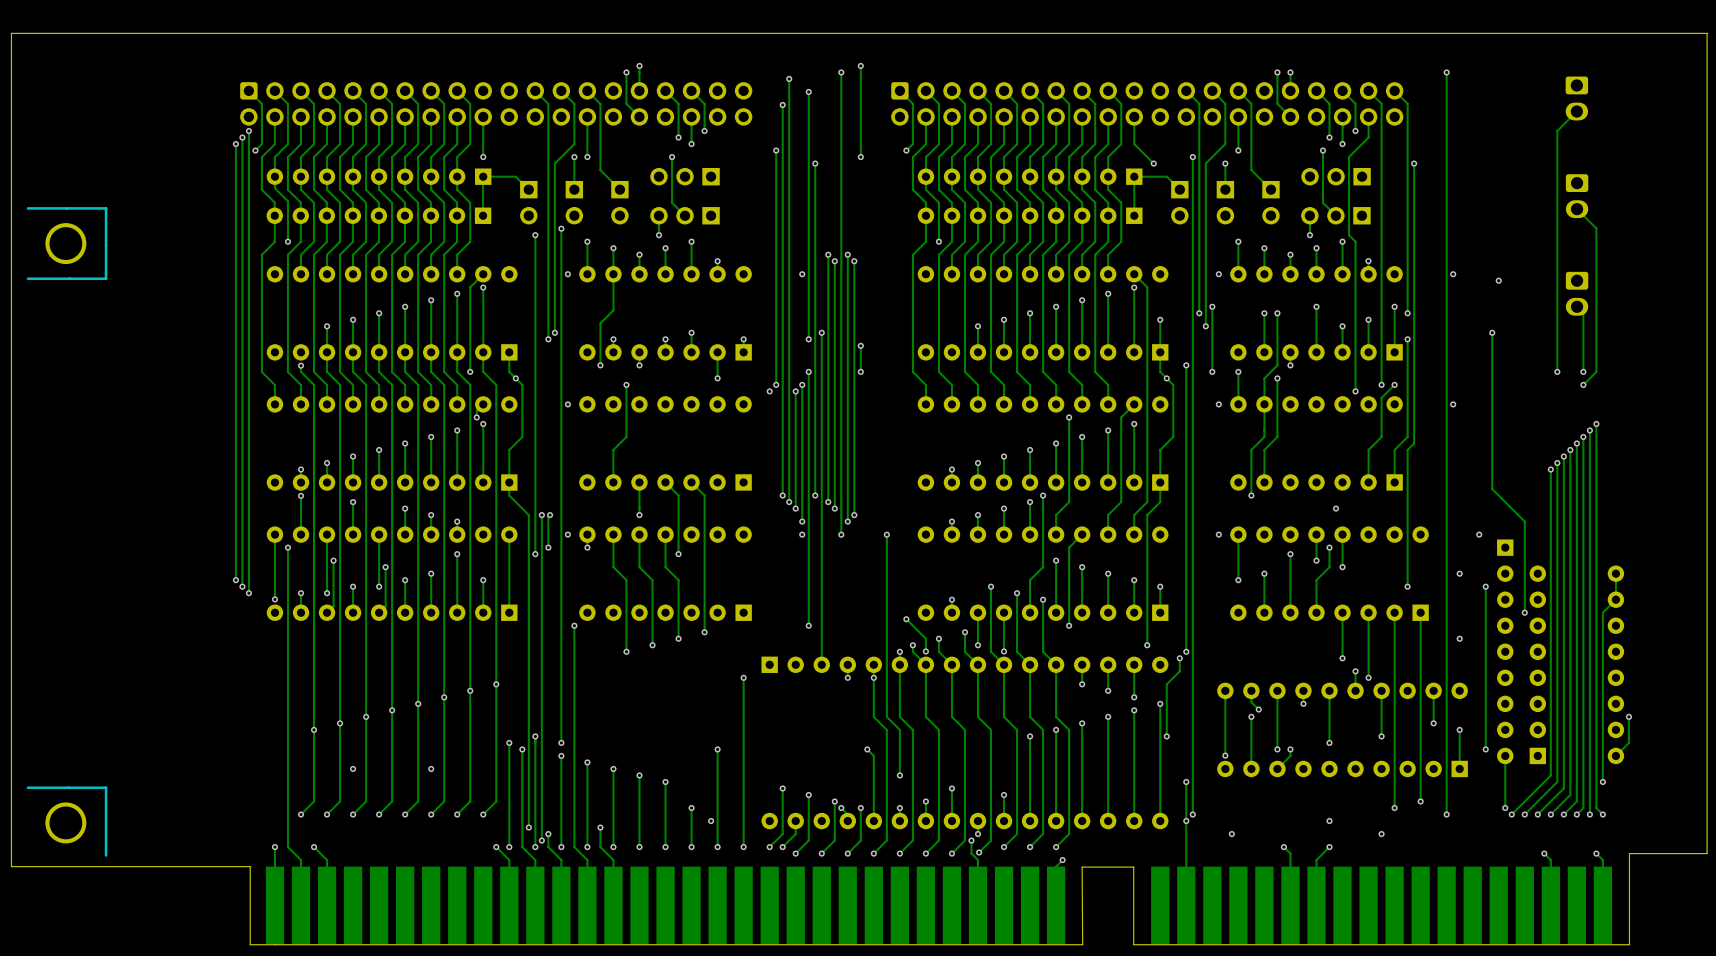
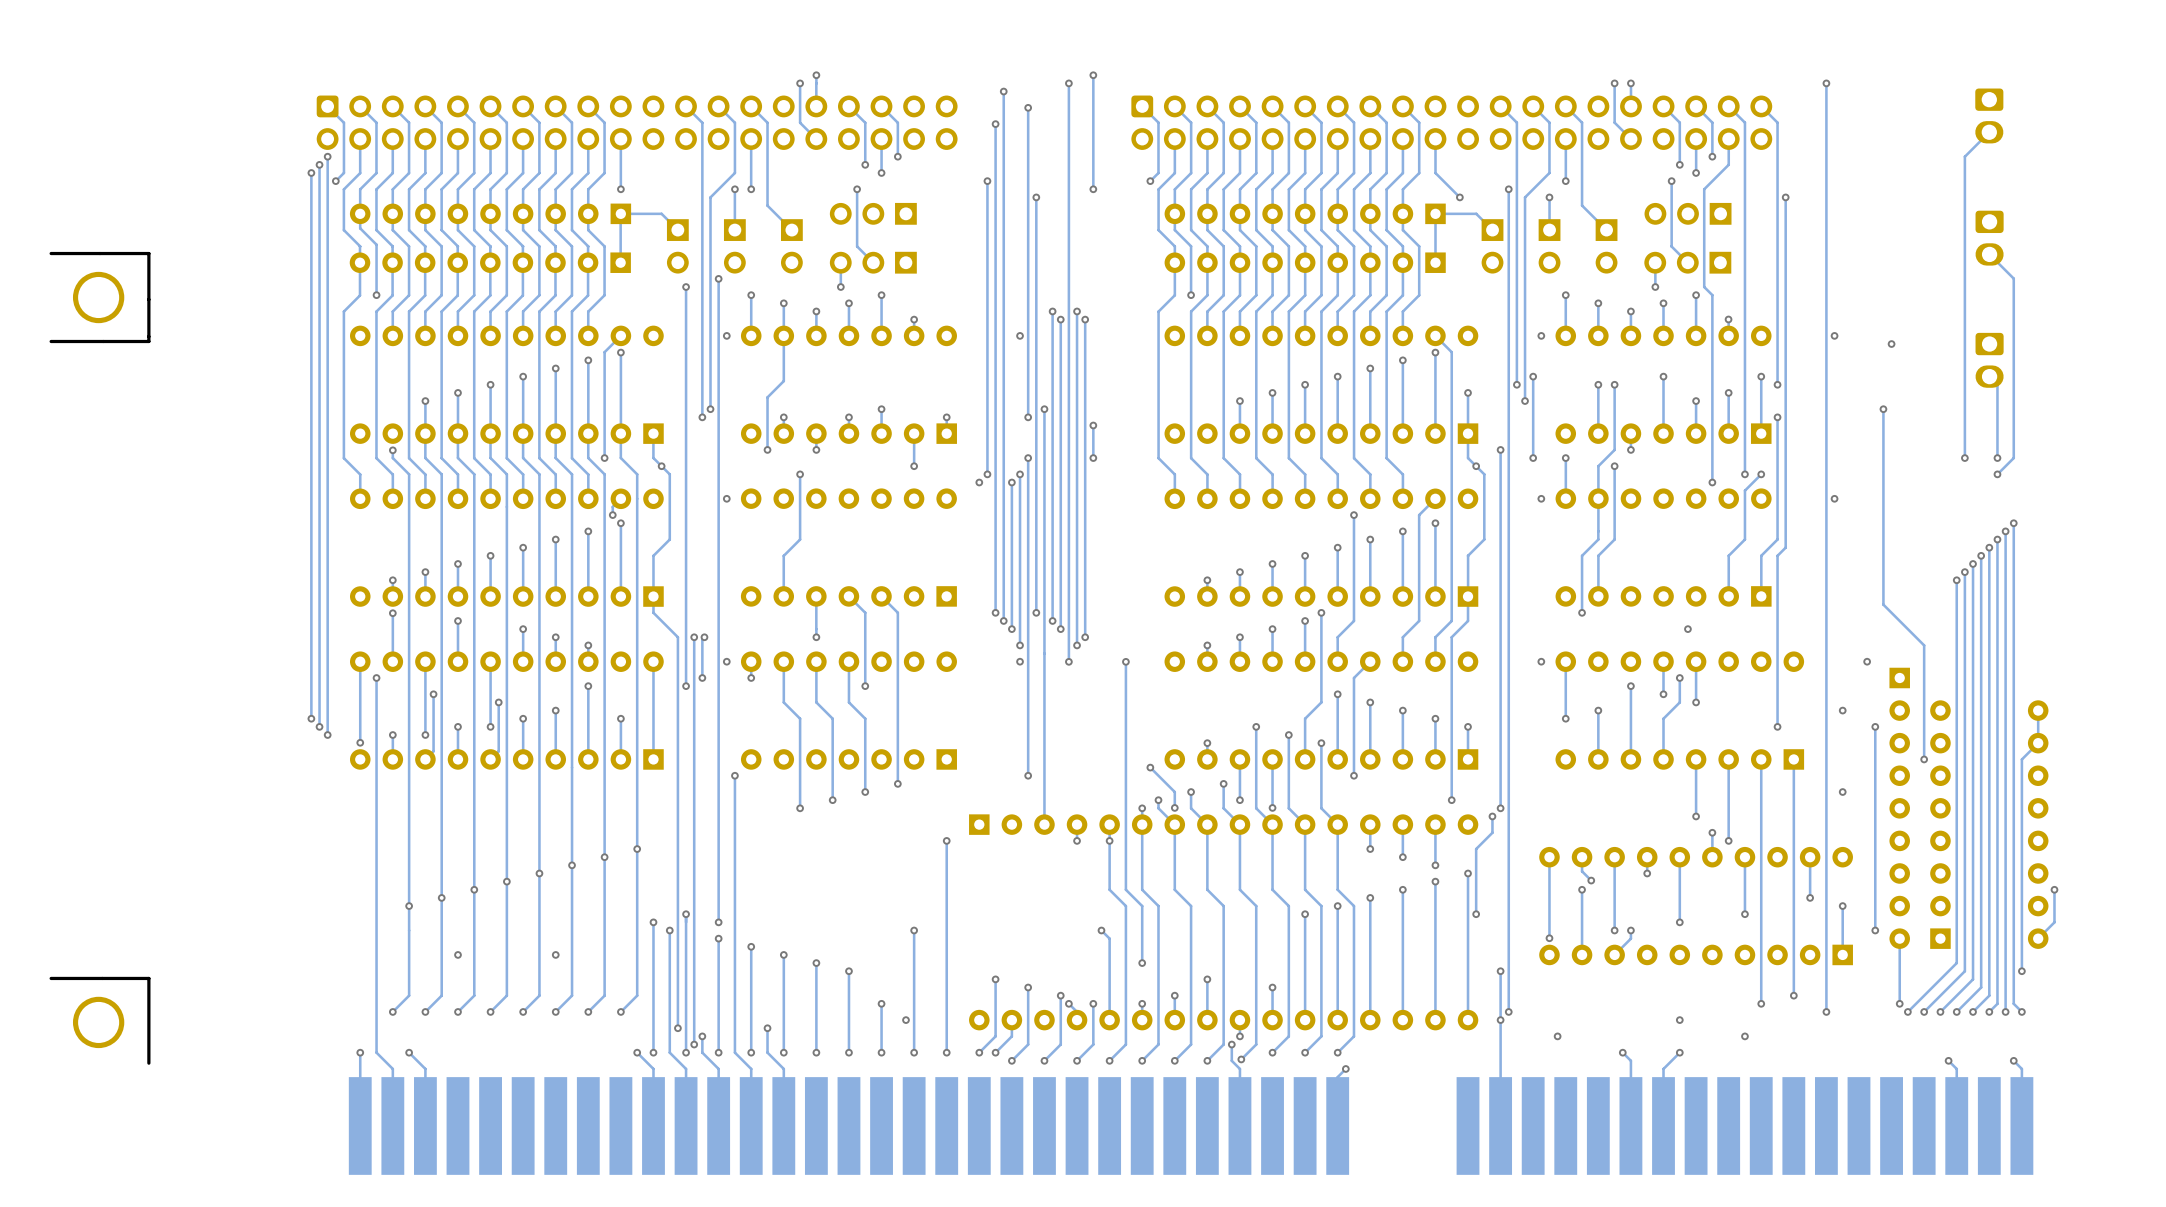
board edge: (1707, 33) (11, 33) (11, 866) (250, 866) (250, 944) (1082, 944) (1082, 867) (1133, 867) (1133, 944) (1629, 944) (1629, 853) (1707, 853) (1707, 33) -> none

